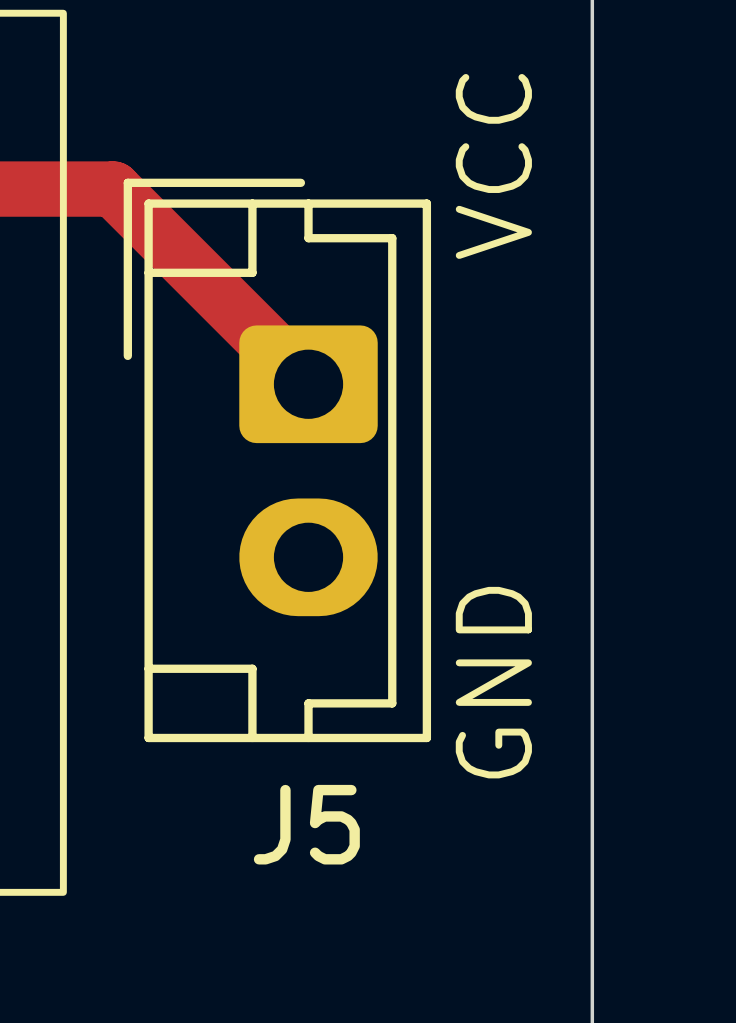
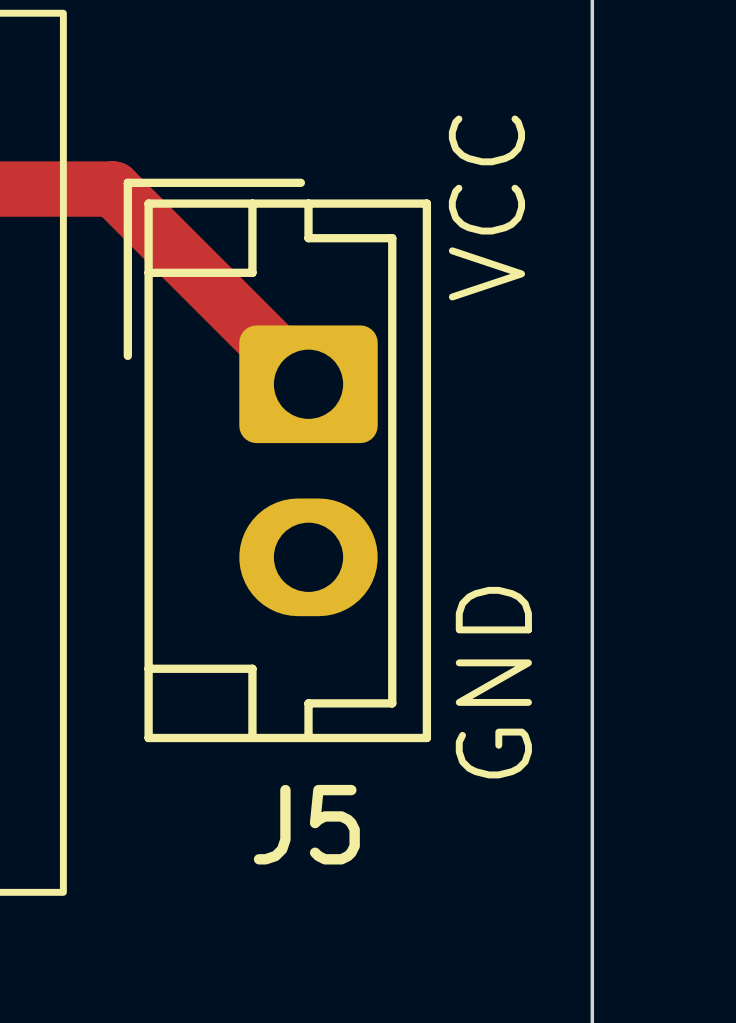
text position: VCC (493, 166) -> VCC (486, 207)

